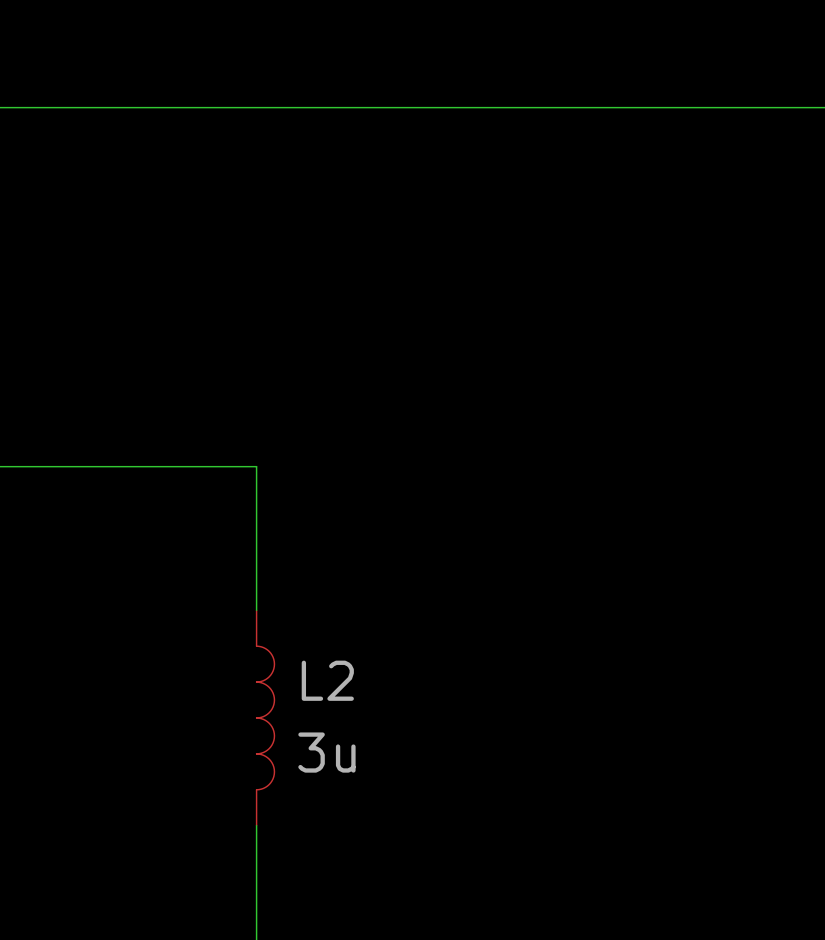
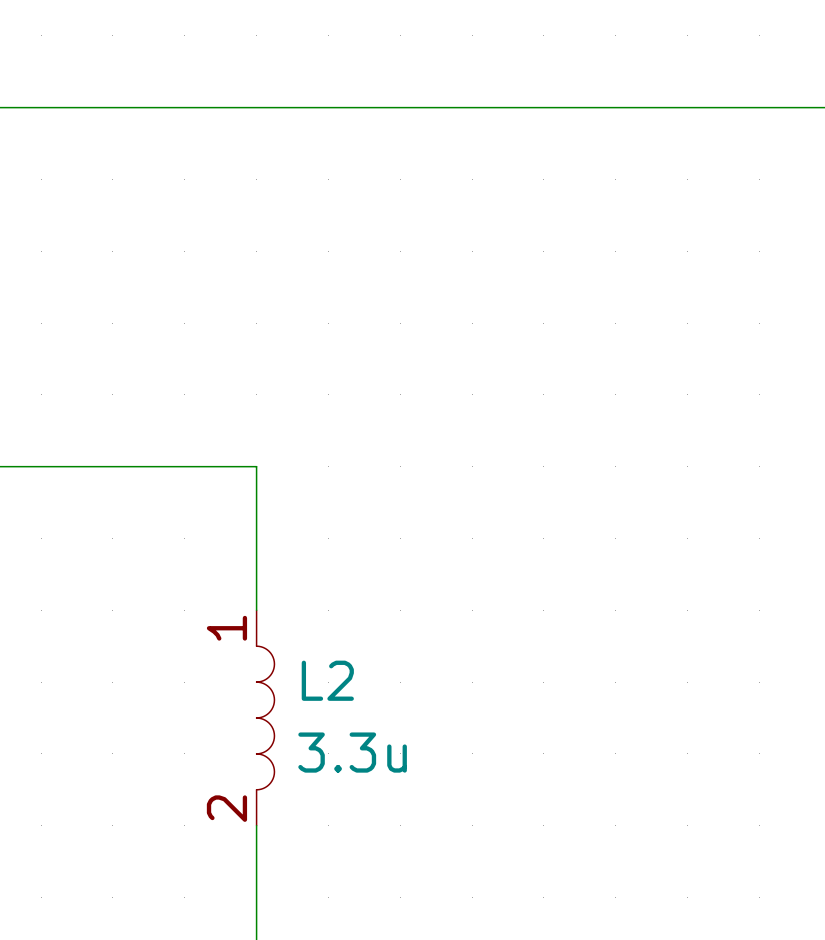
L2 pin number: none -> 1 (226, 628)
L2 value: 3u (326, 752) -> 3.3u (352, 752)
L2 pin number: none -> 2 (226, 808)

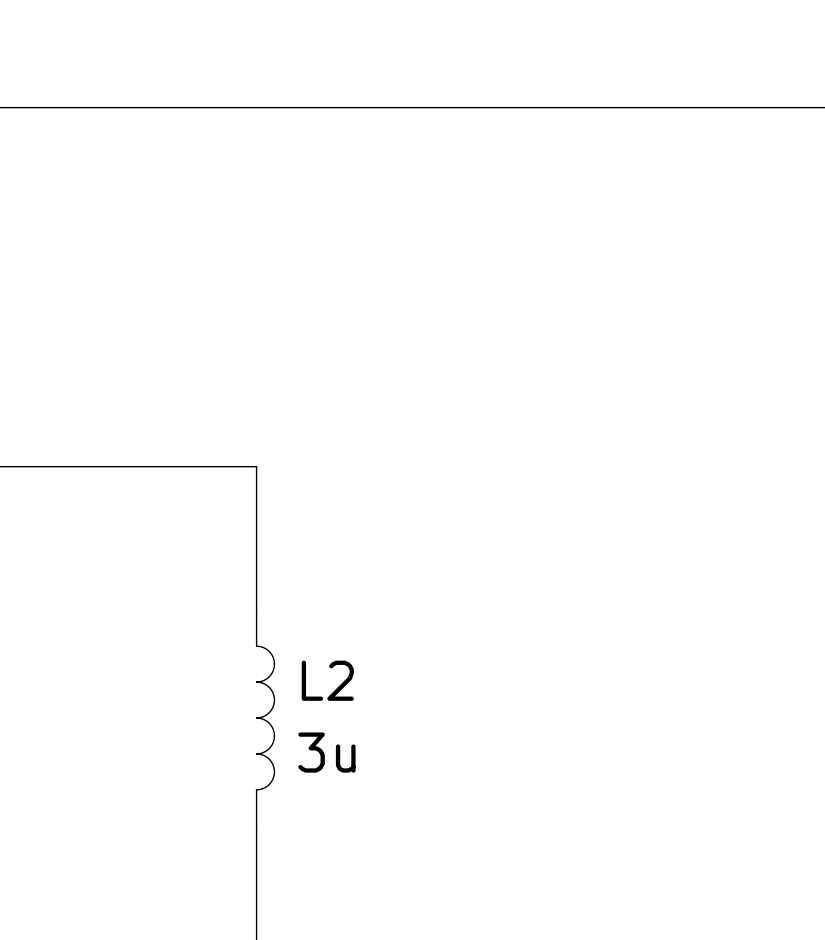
L2 pin number: 1 (226, 628) -> none
L2 value: 3.3u (352, 752) -> 3u (326, 752)
L2 pin number: 2 (226, 808) -> none

